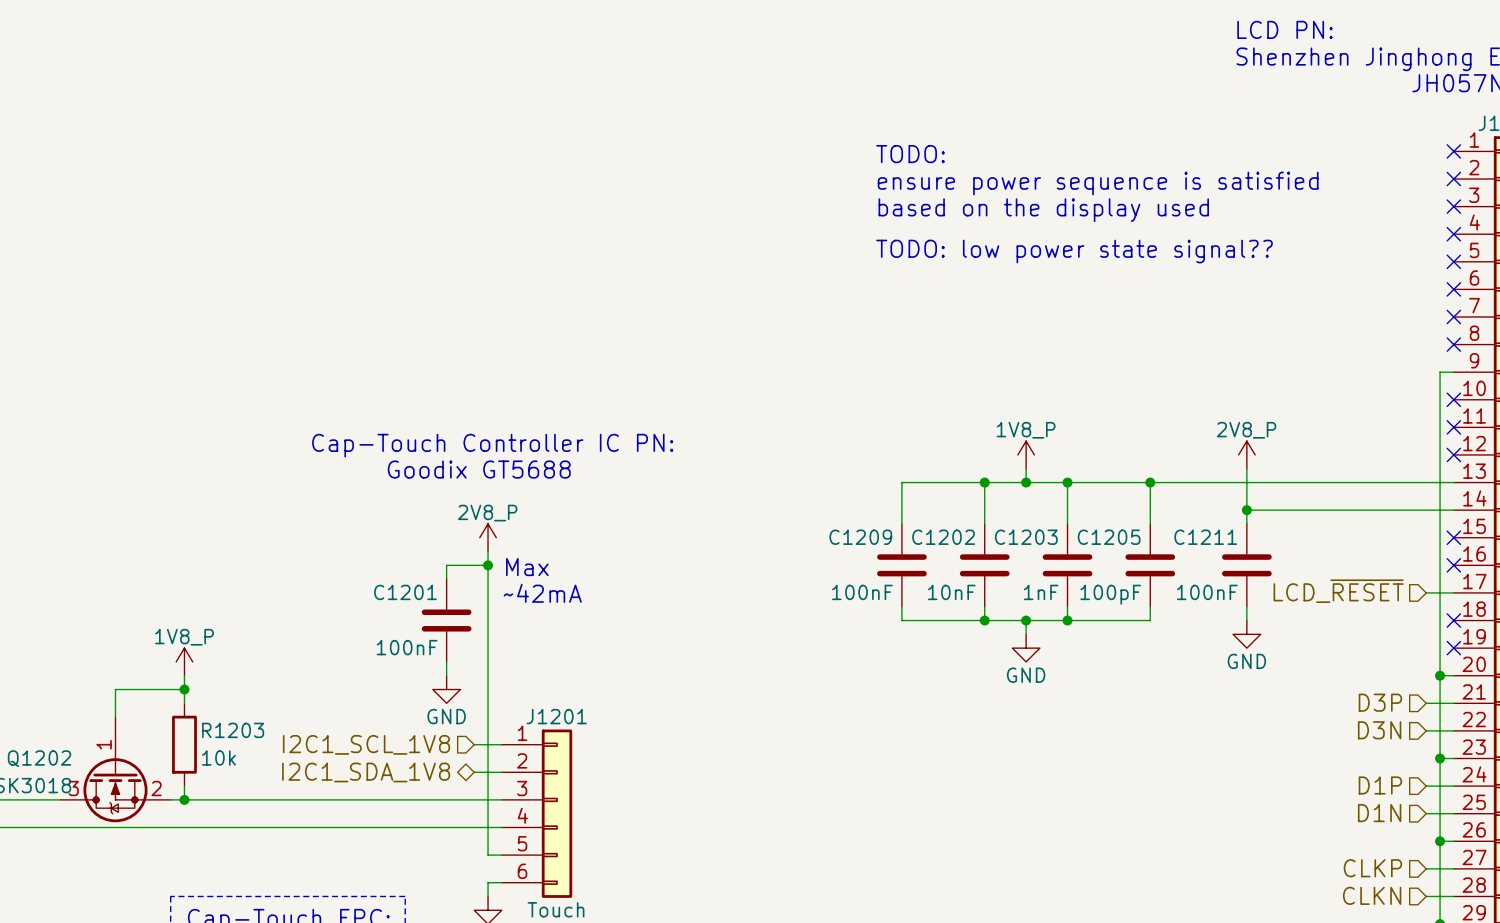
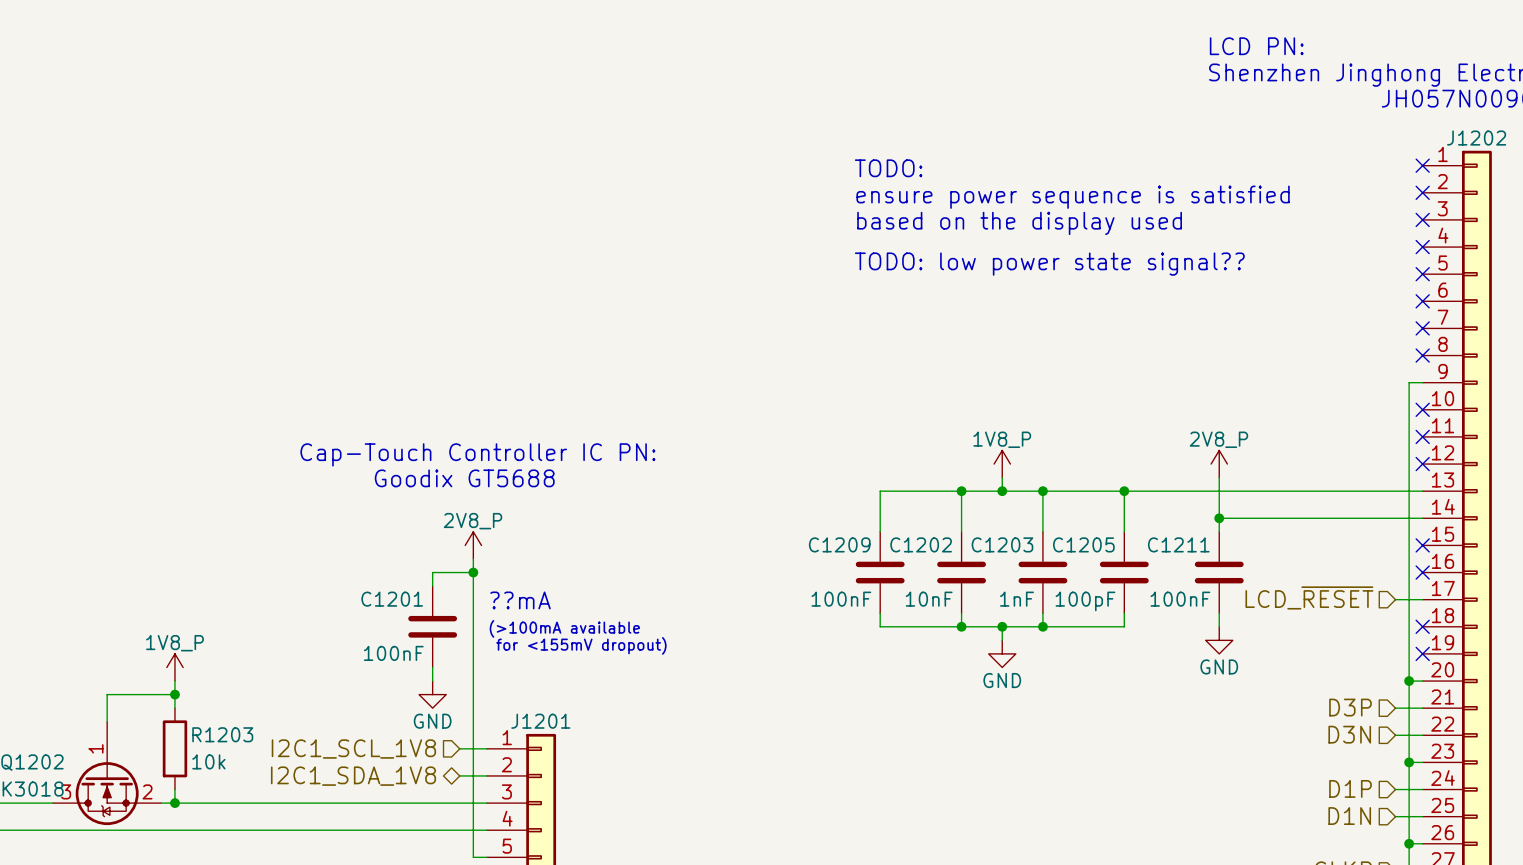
text: Max (527, 567) -> none
text: ~42mA (542, 593) -> ??mA (520, 600)
text: none -> (>100mA available (564, 628)
text: none -> for <155mV dropout) (581, 645)

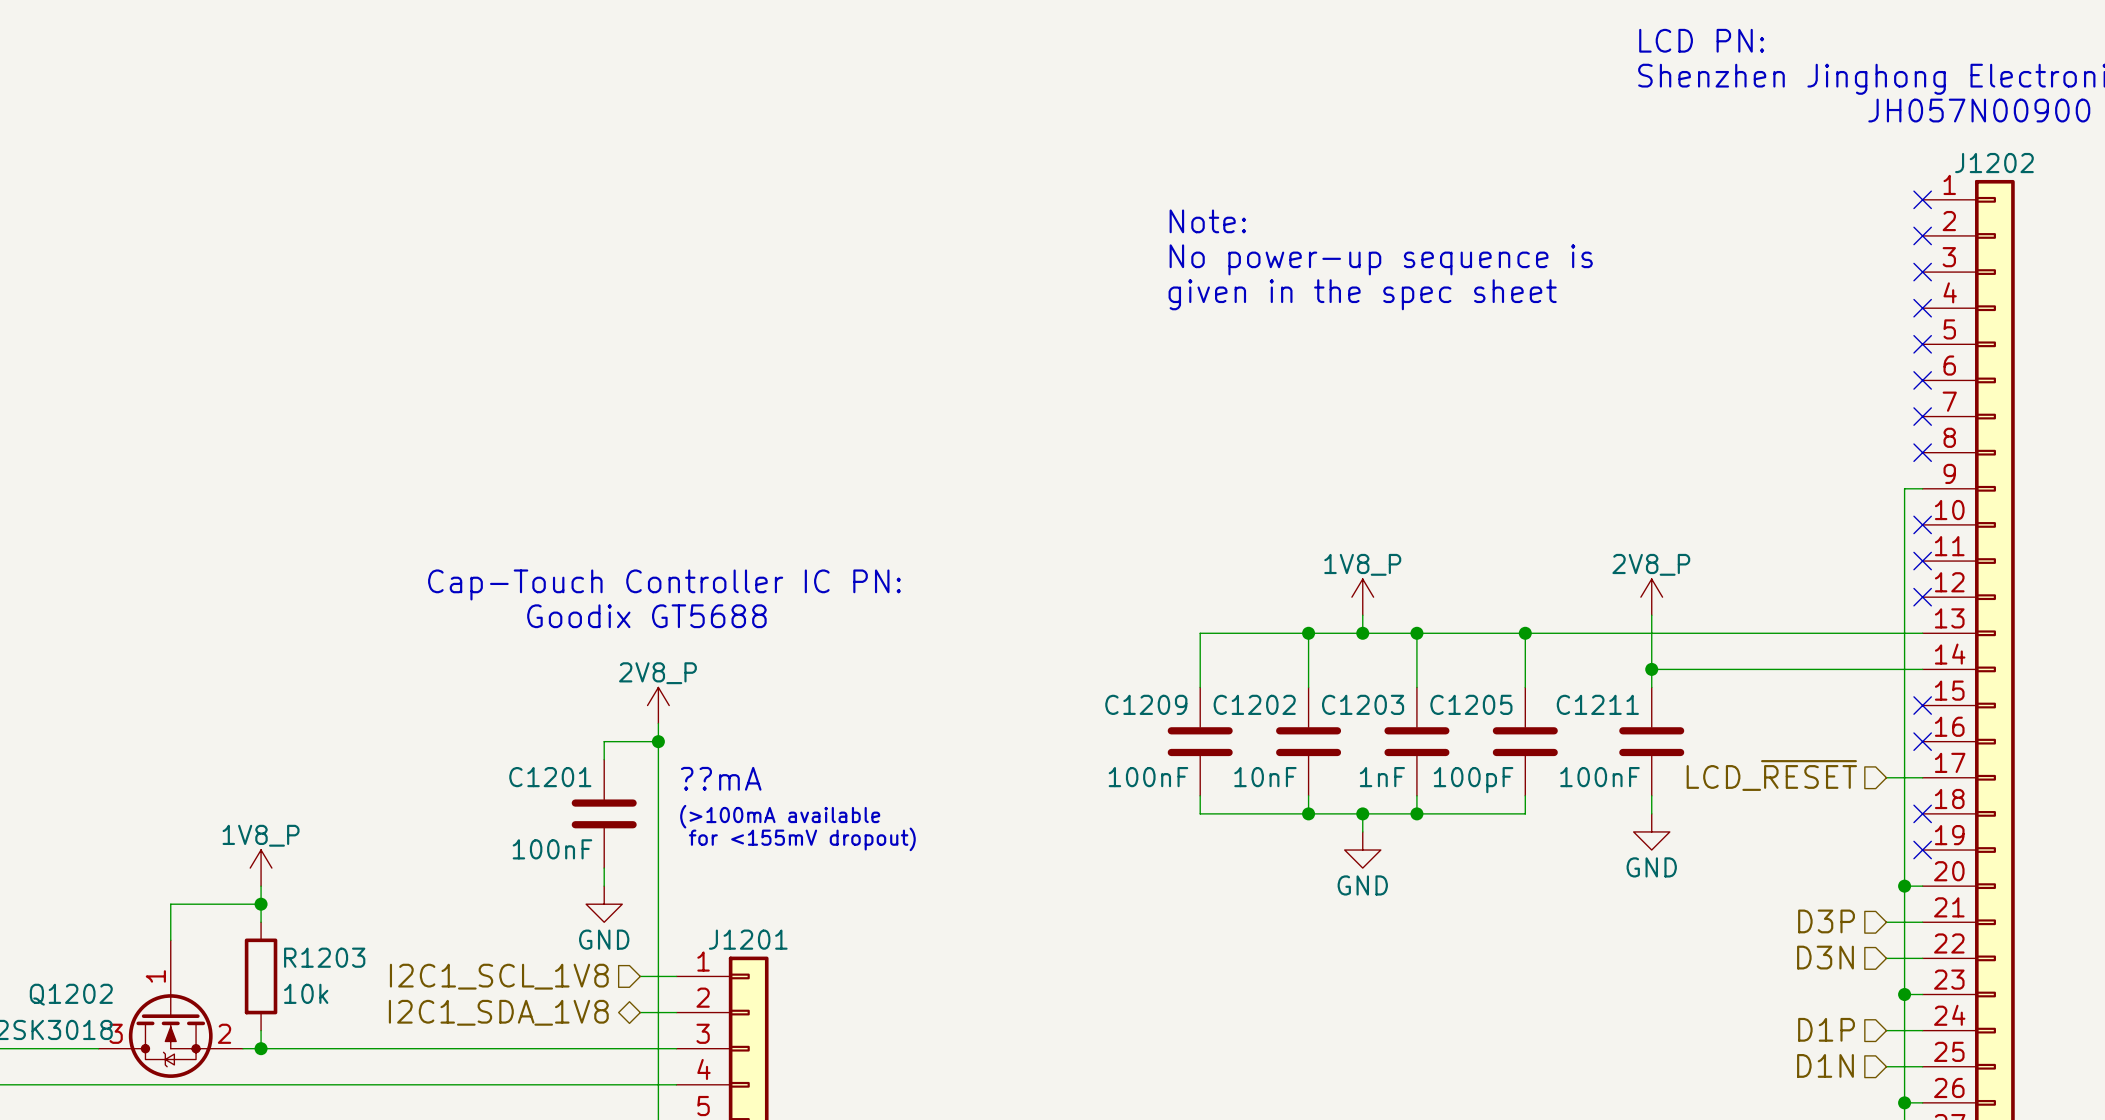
text: TODO: (888, 168) -> none
text: none -> Note: (1207, 221)
text: ensure power sequence is satisfied (1073, 197) -> No power-up sequence is (1381, 259)
text: based on the display used (1019, 223) -> none
text: none -> given in the spec sheet (1362, 294)
text: TODO: low power state signal?? (1049, 264) -> none

